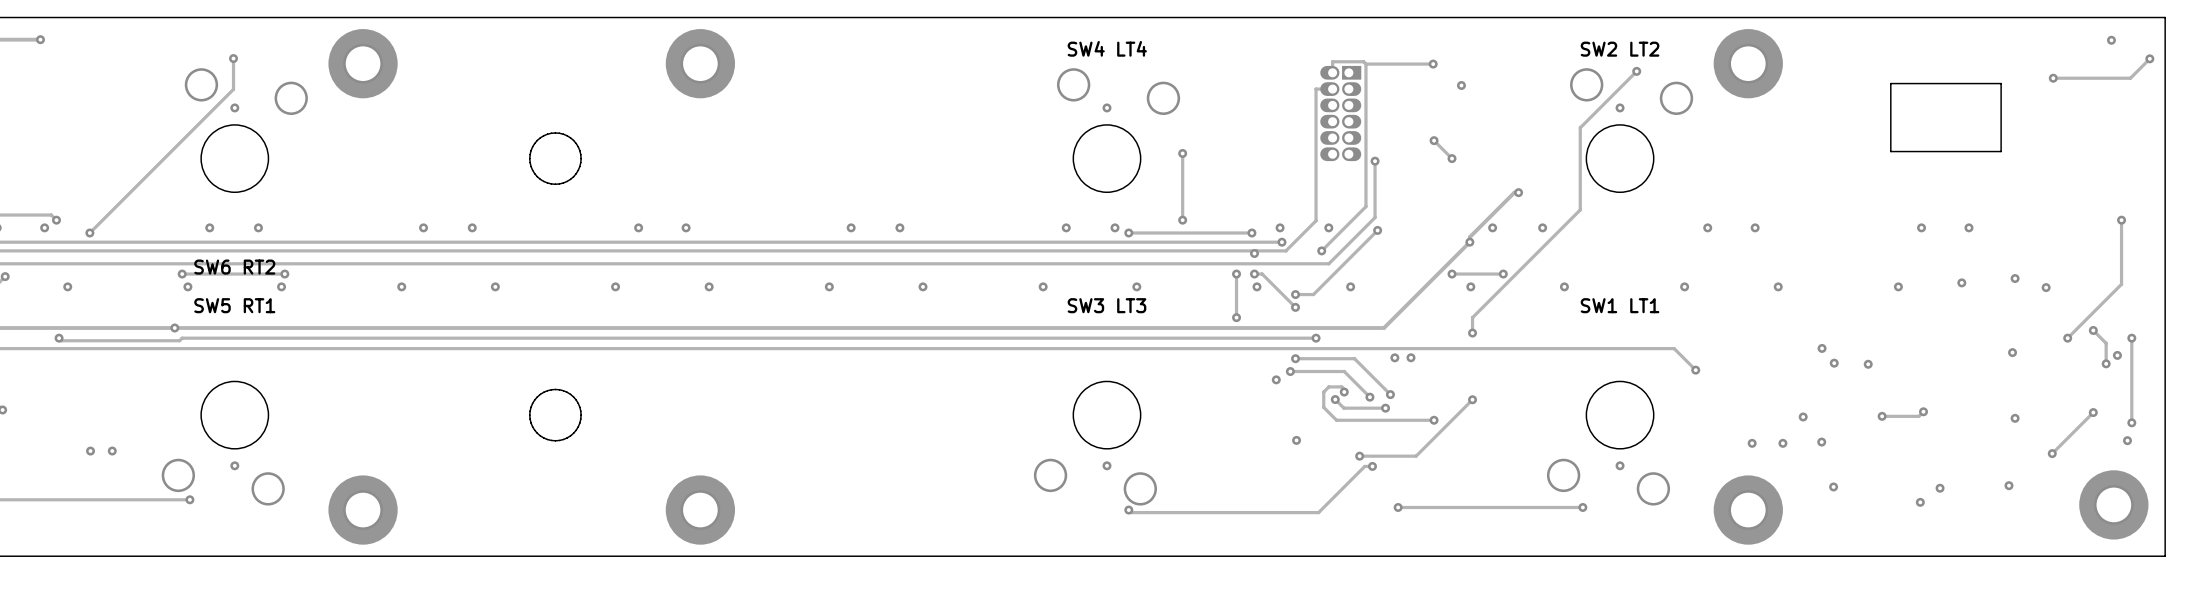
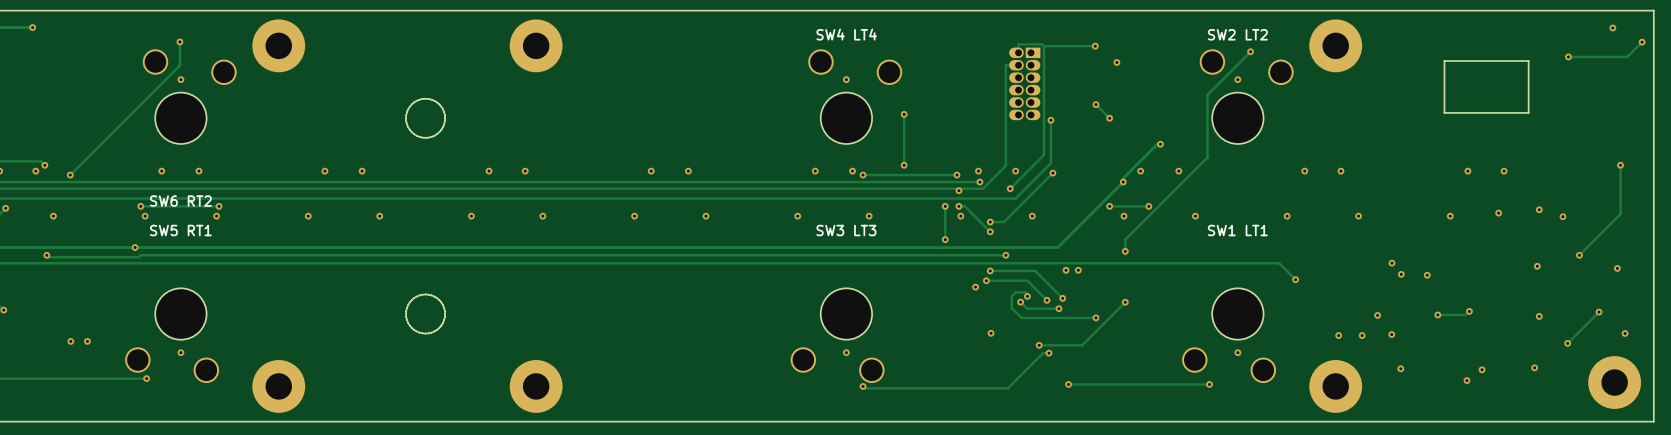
track: (2093, 330) (2106, 343) (2106, 363) -> none
via: (2093, 330) -> none
track: (2131, 338) (2131, 422) -> none
via: (2131, 338) -> none
via: (2106, 363) -> none
via: (2131, 422) -> none

